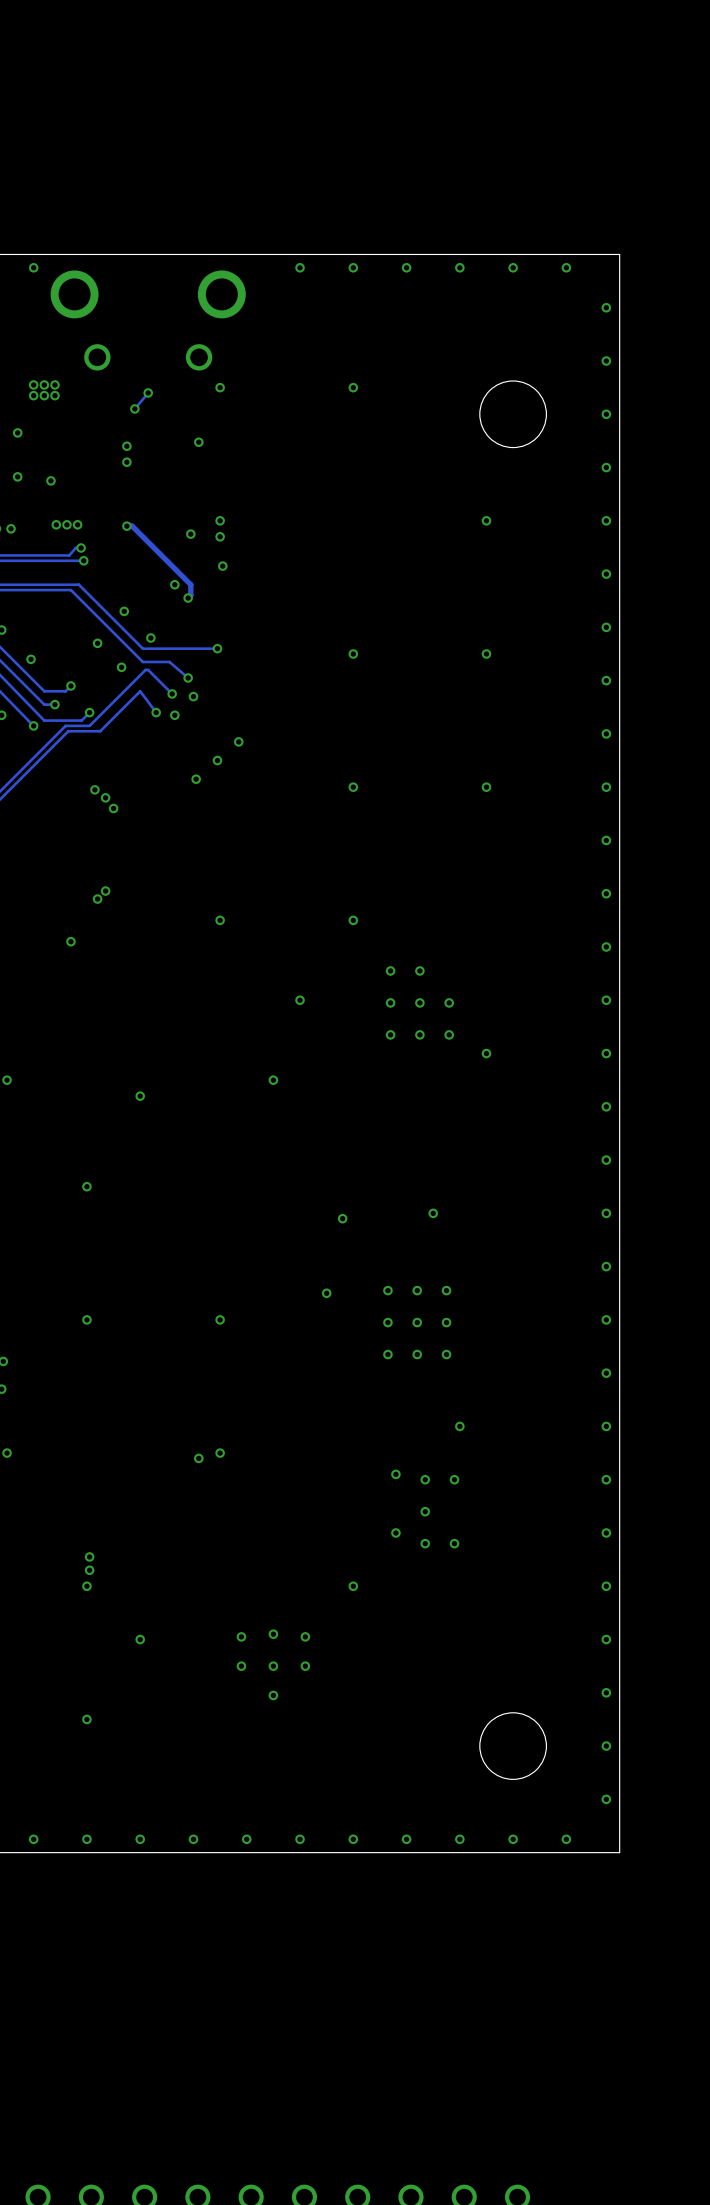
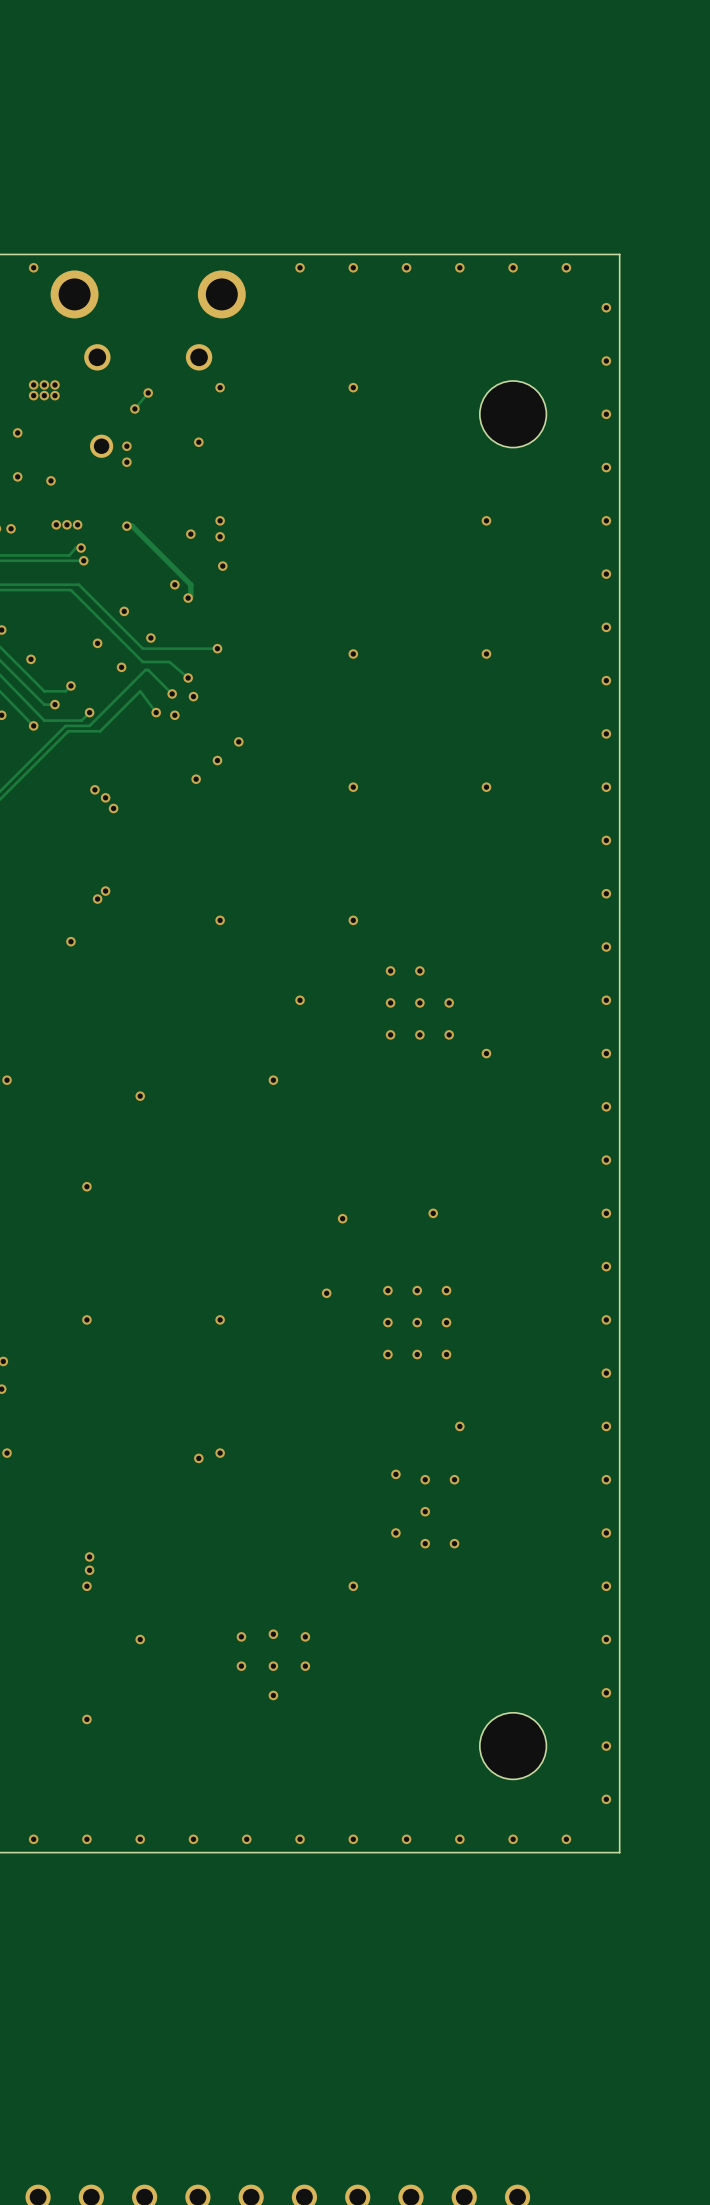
part: none -> (101, 446)

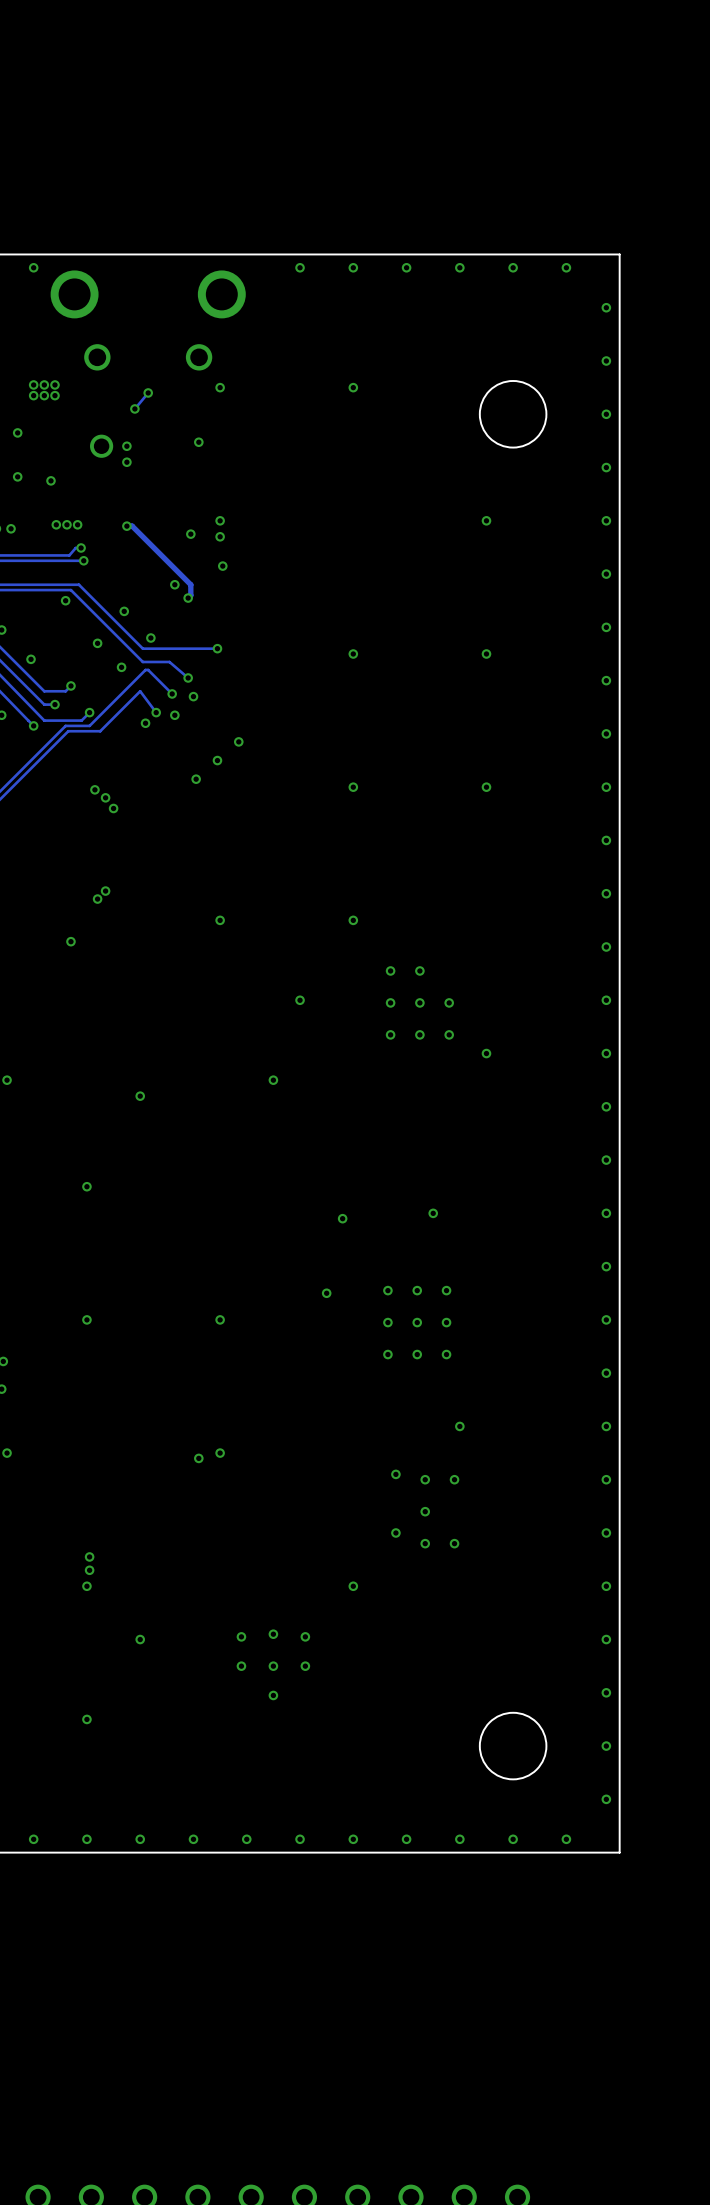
via: none -> (65, 600)
via: none -> (145, 723)

